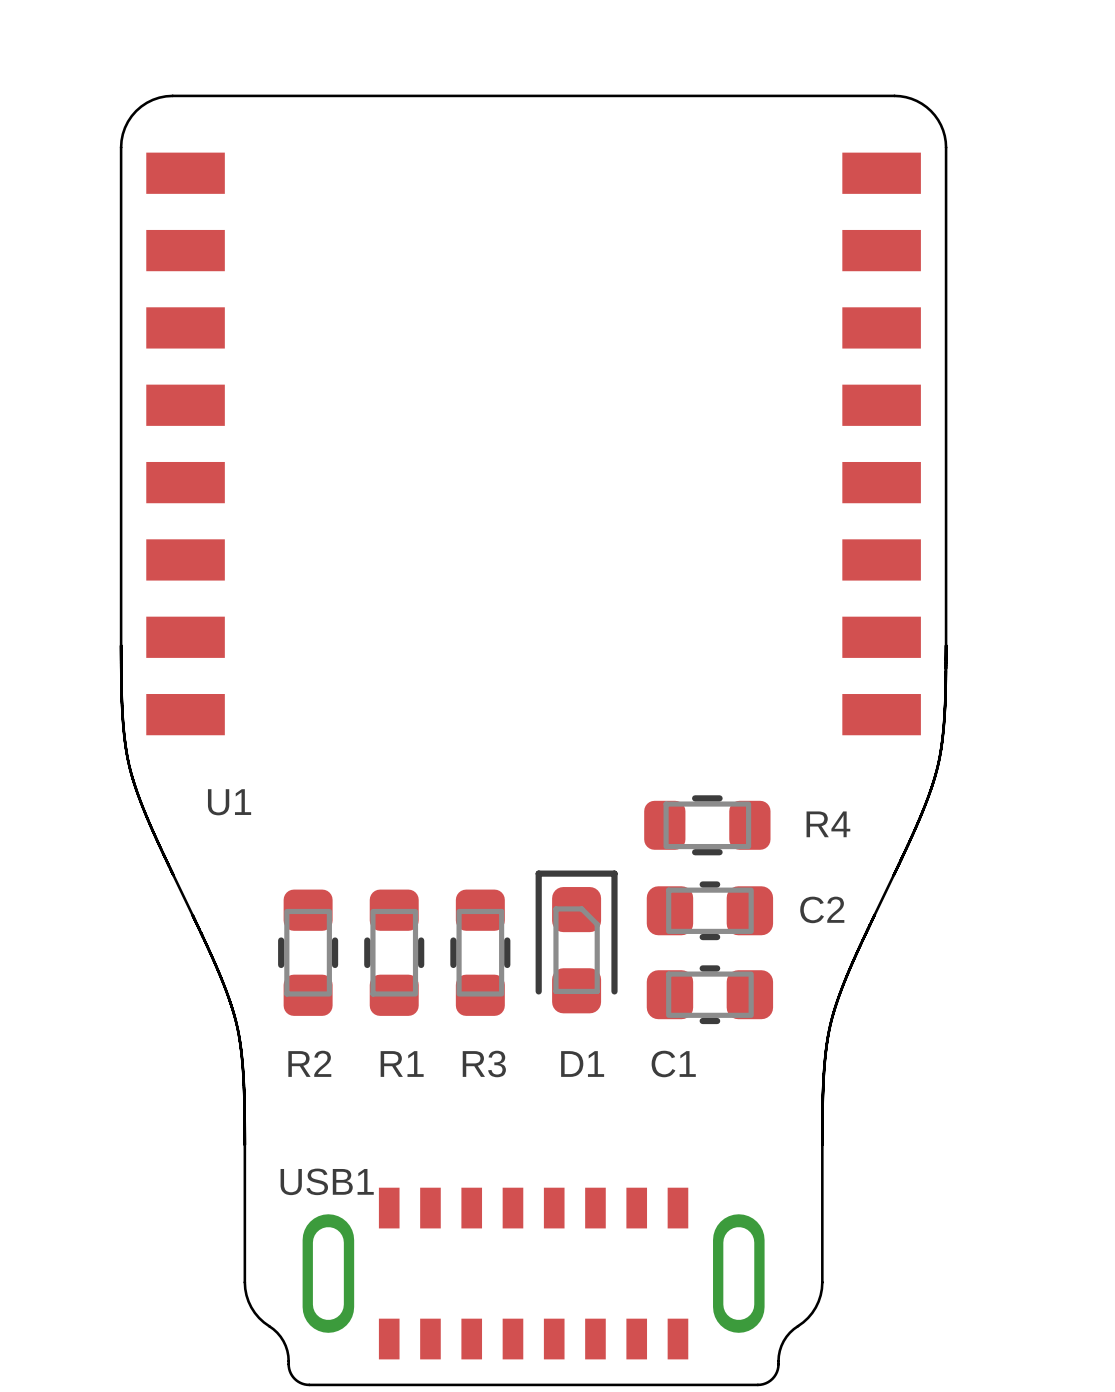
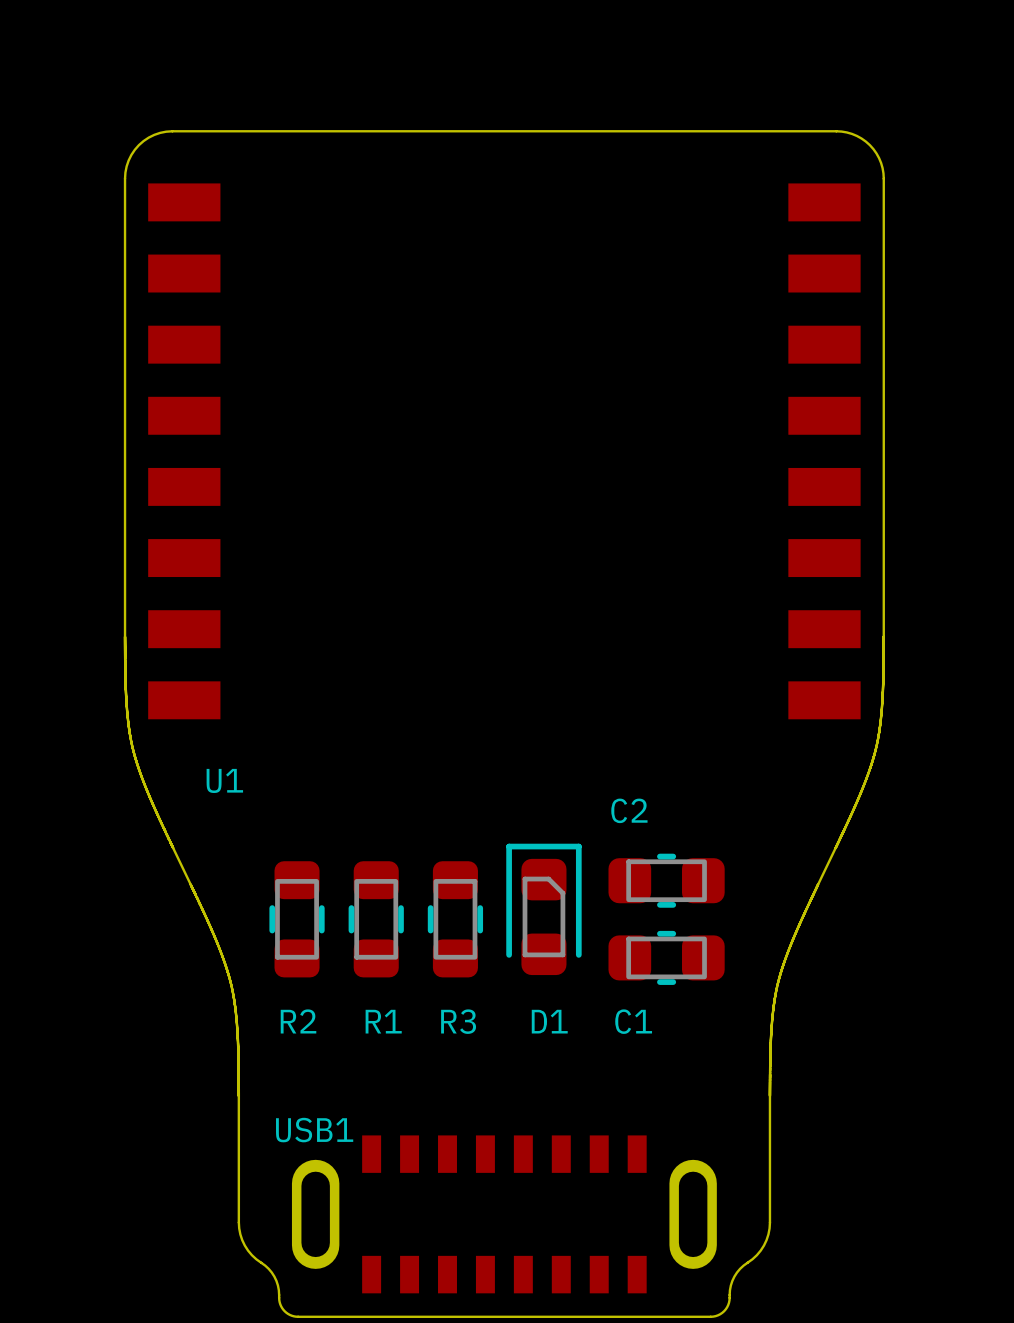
R4: (707, 825) -> none
C2 name position: C2 (822, 909) -> C2 (629, 810)

